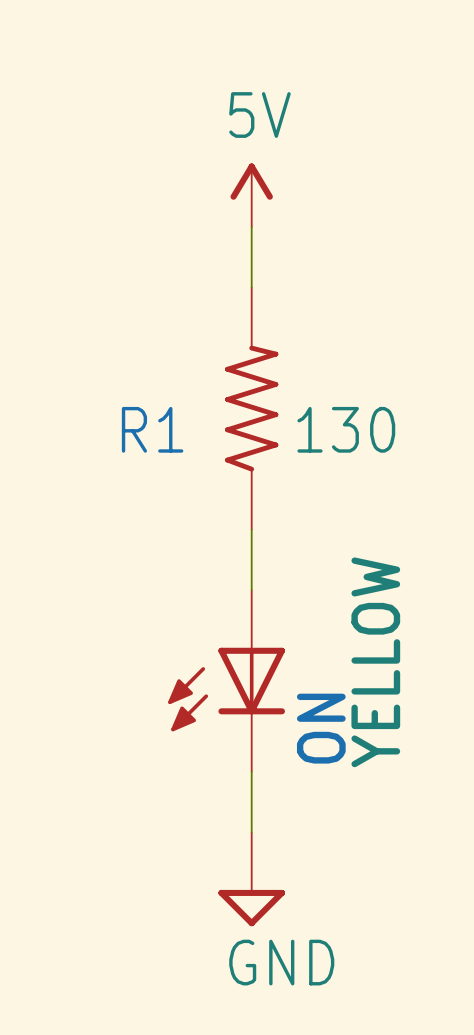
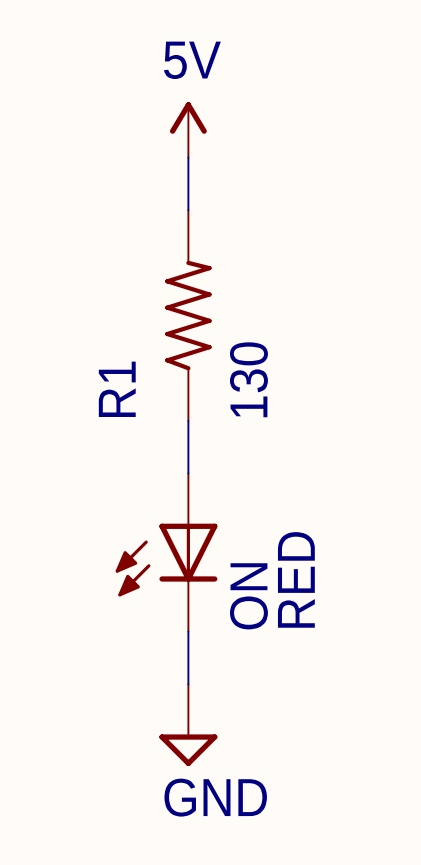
R1 name rotation: 0° (152, 429) -> 90° counterclockwise (117, 389)
R1 value rotation: 0° (346, 429) -> 90° counterclockwise (248, 379)
ON value: YELLOW (375, 662) -> RED (296, 579)

